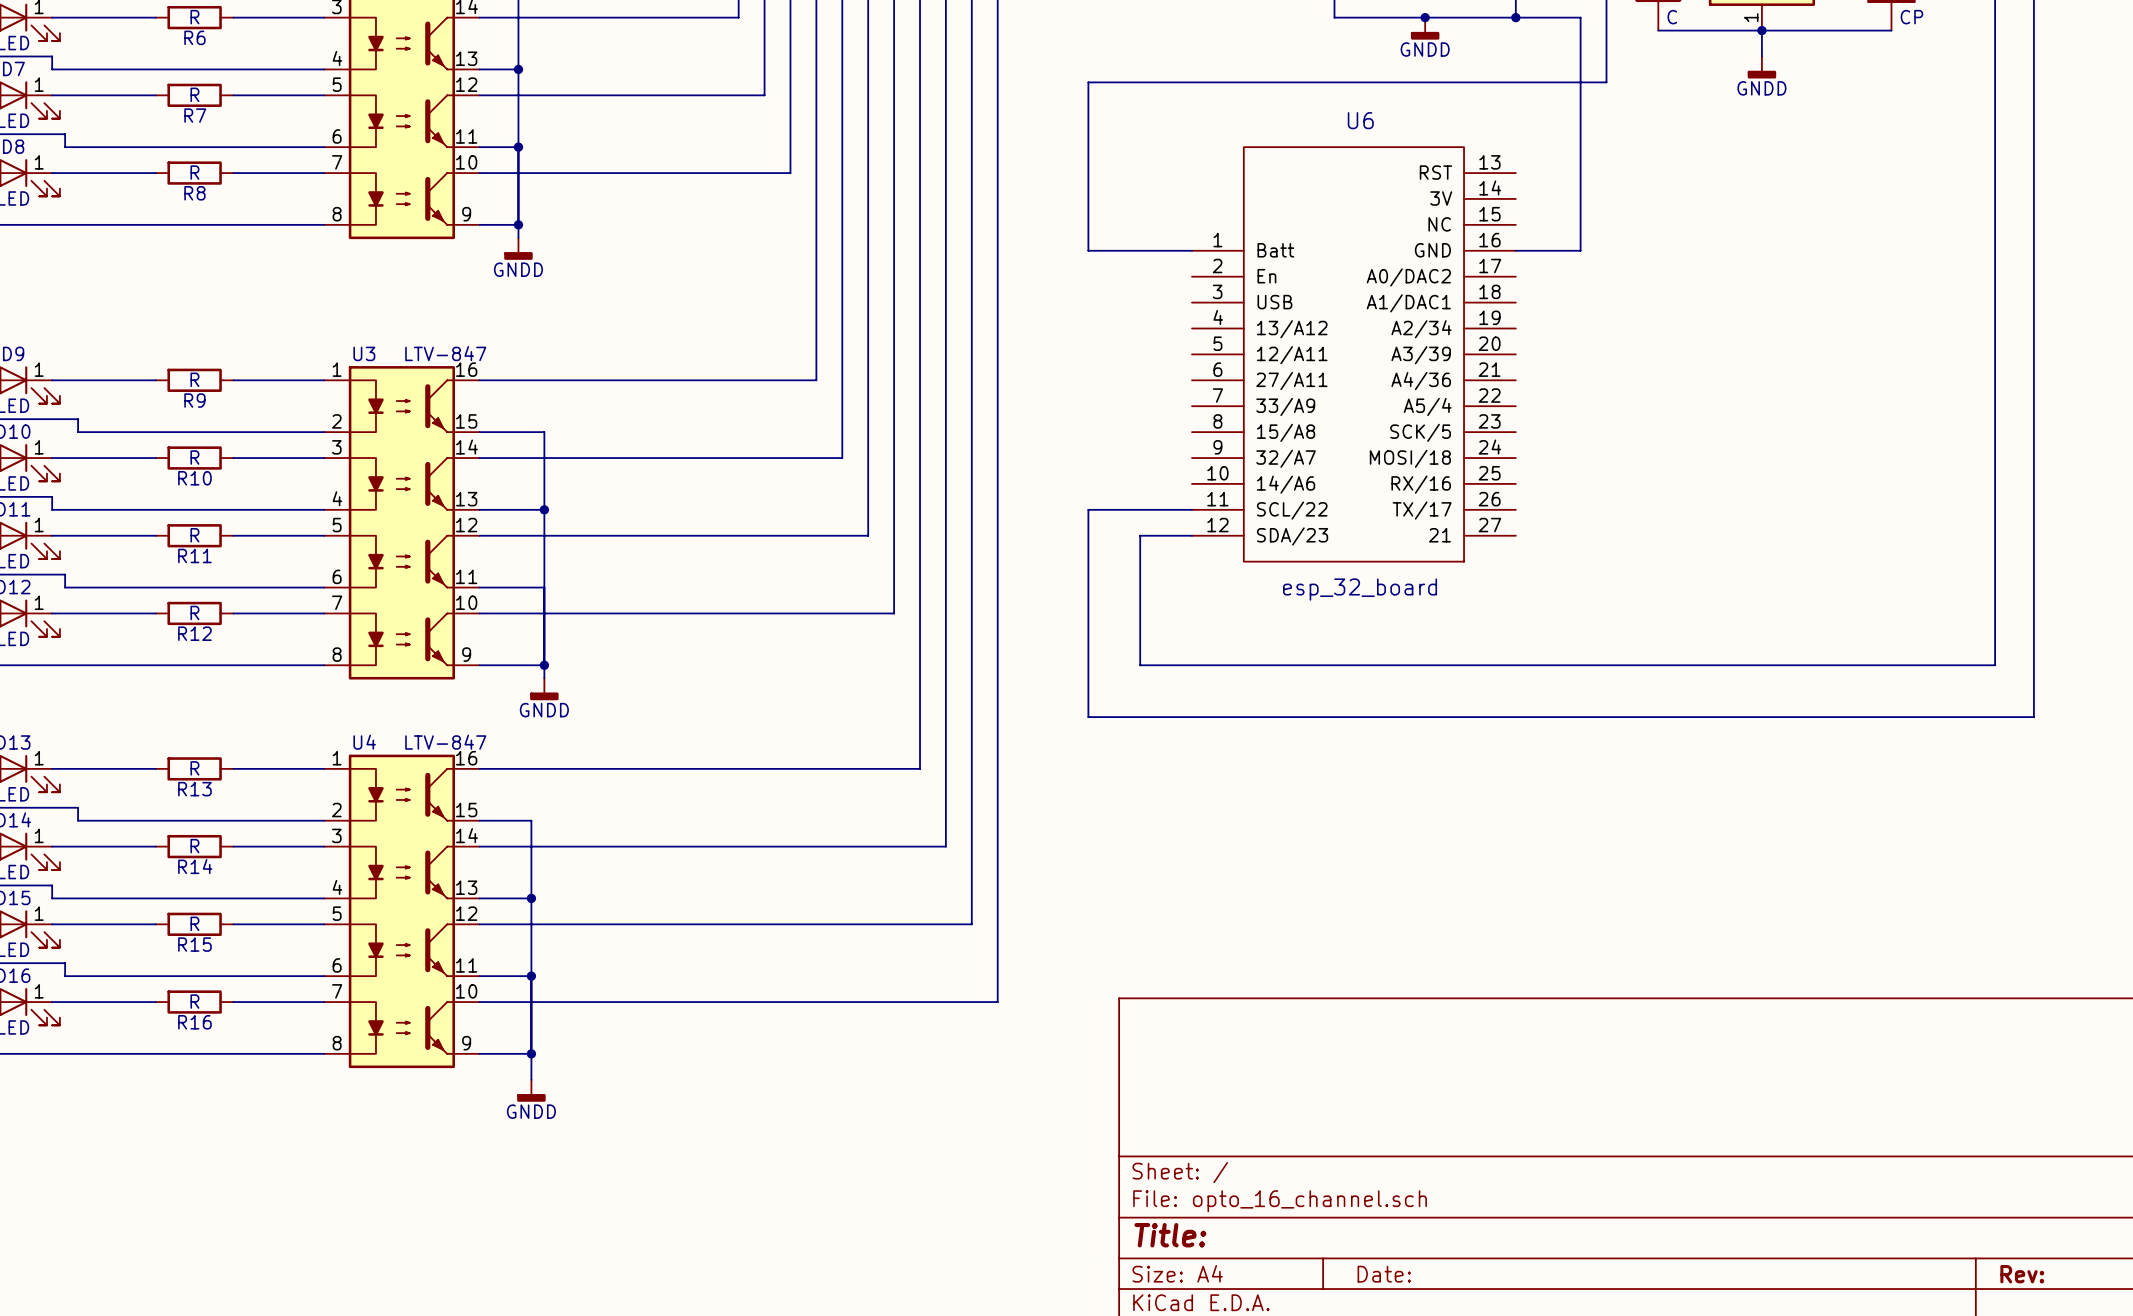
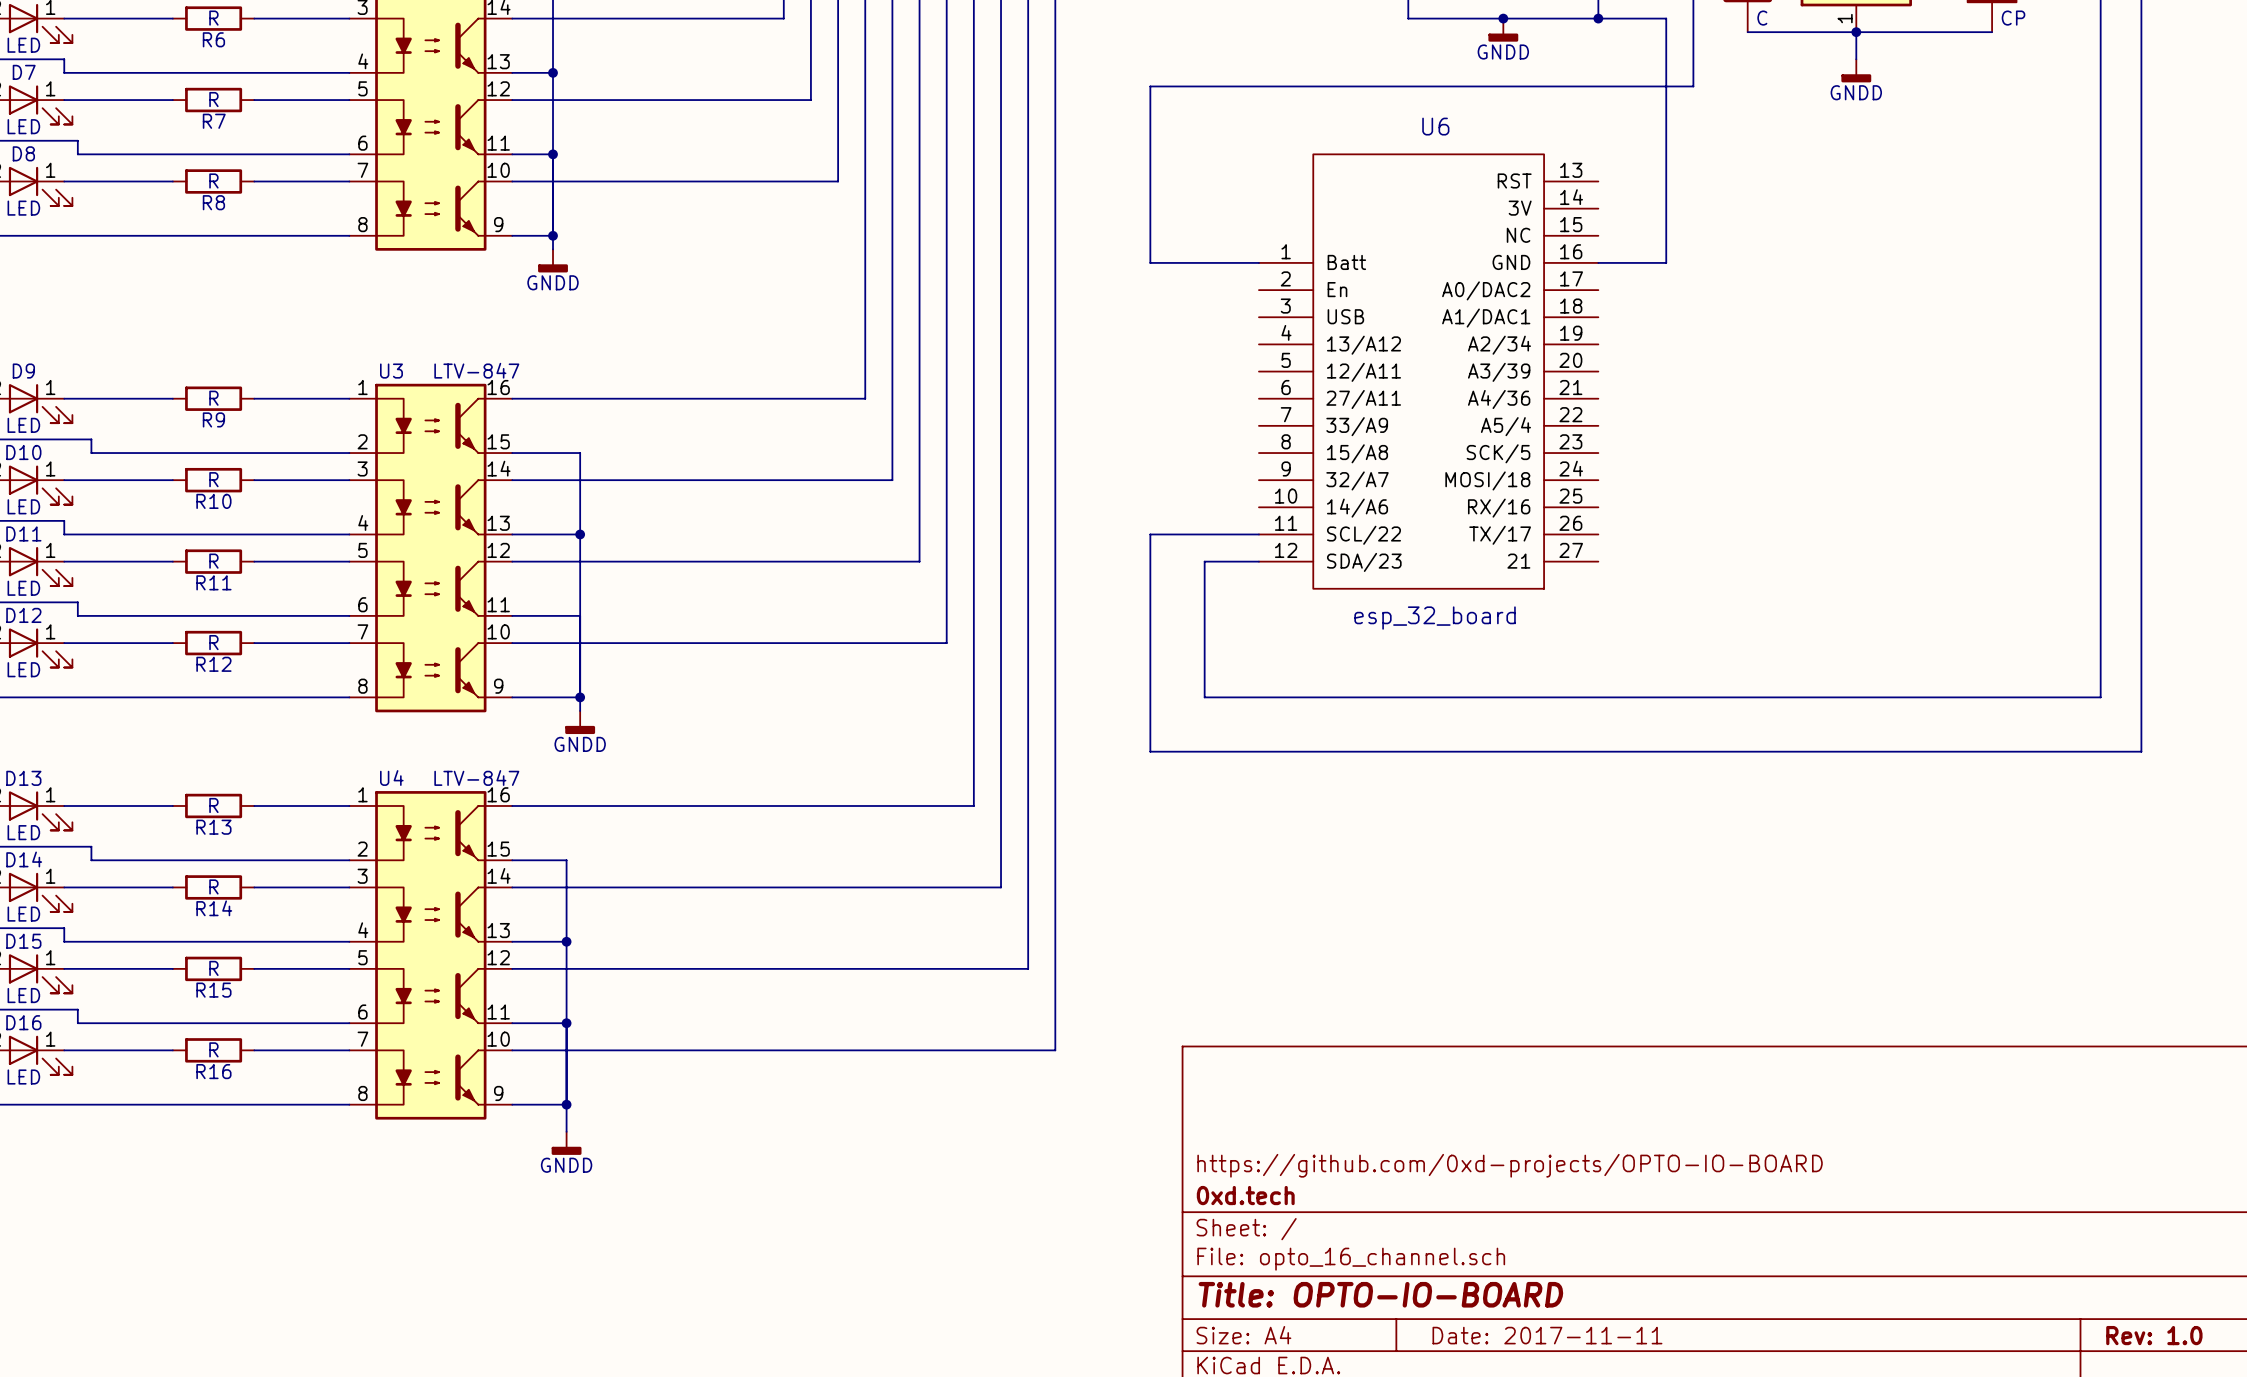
title block: none -> https://github.com/0xd-projects/OPTO-IO-BOARD (1510, 1165)
title block: none -> 0xd.tech (1245, 1195)
title block: Title: (1170, 1235) -> Title: OPTO-IO-BOARD (1380, 1294)
title block: Date: (1384, 1274) -> Date: 2017-11-11 (1547, 1335)
title block: Rev: (2022, 1274) -> Rev: 1.0 (2154, 1335)

